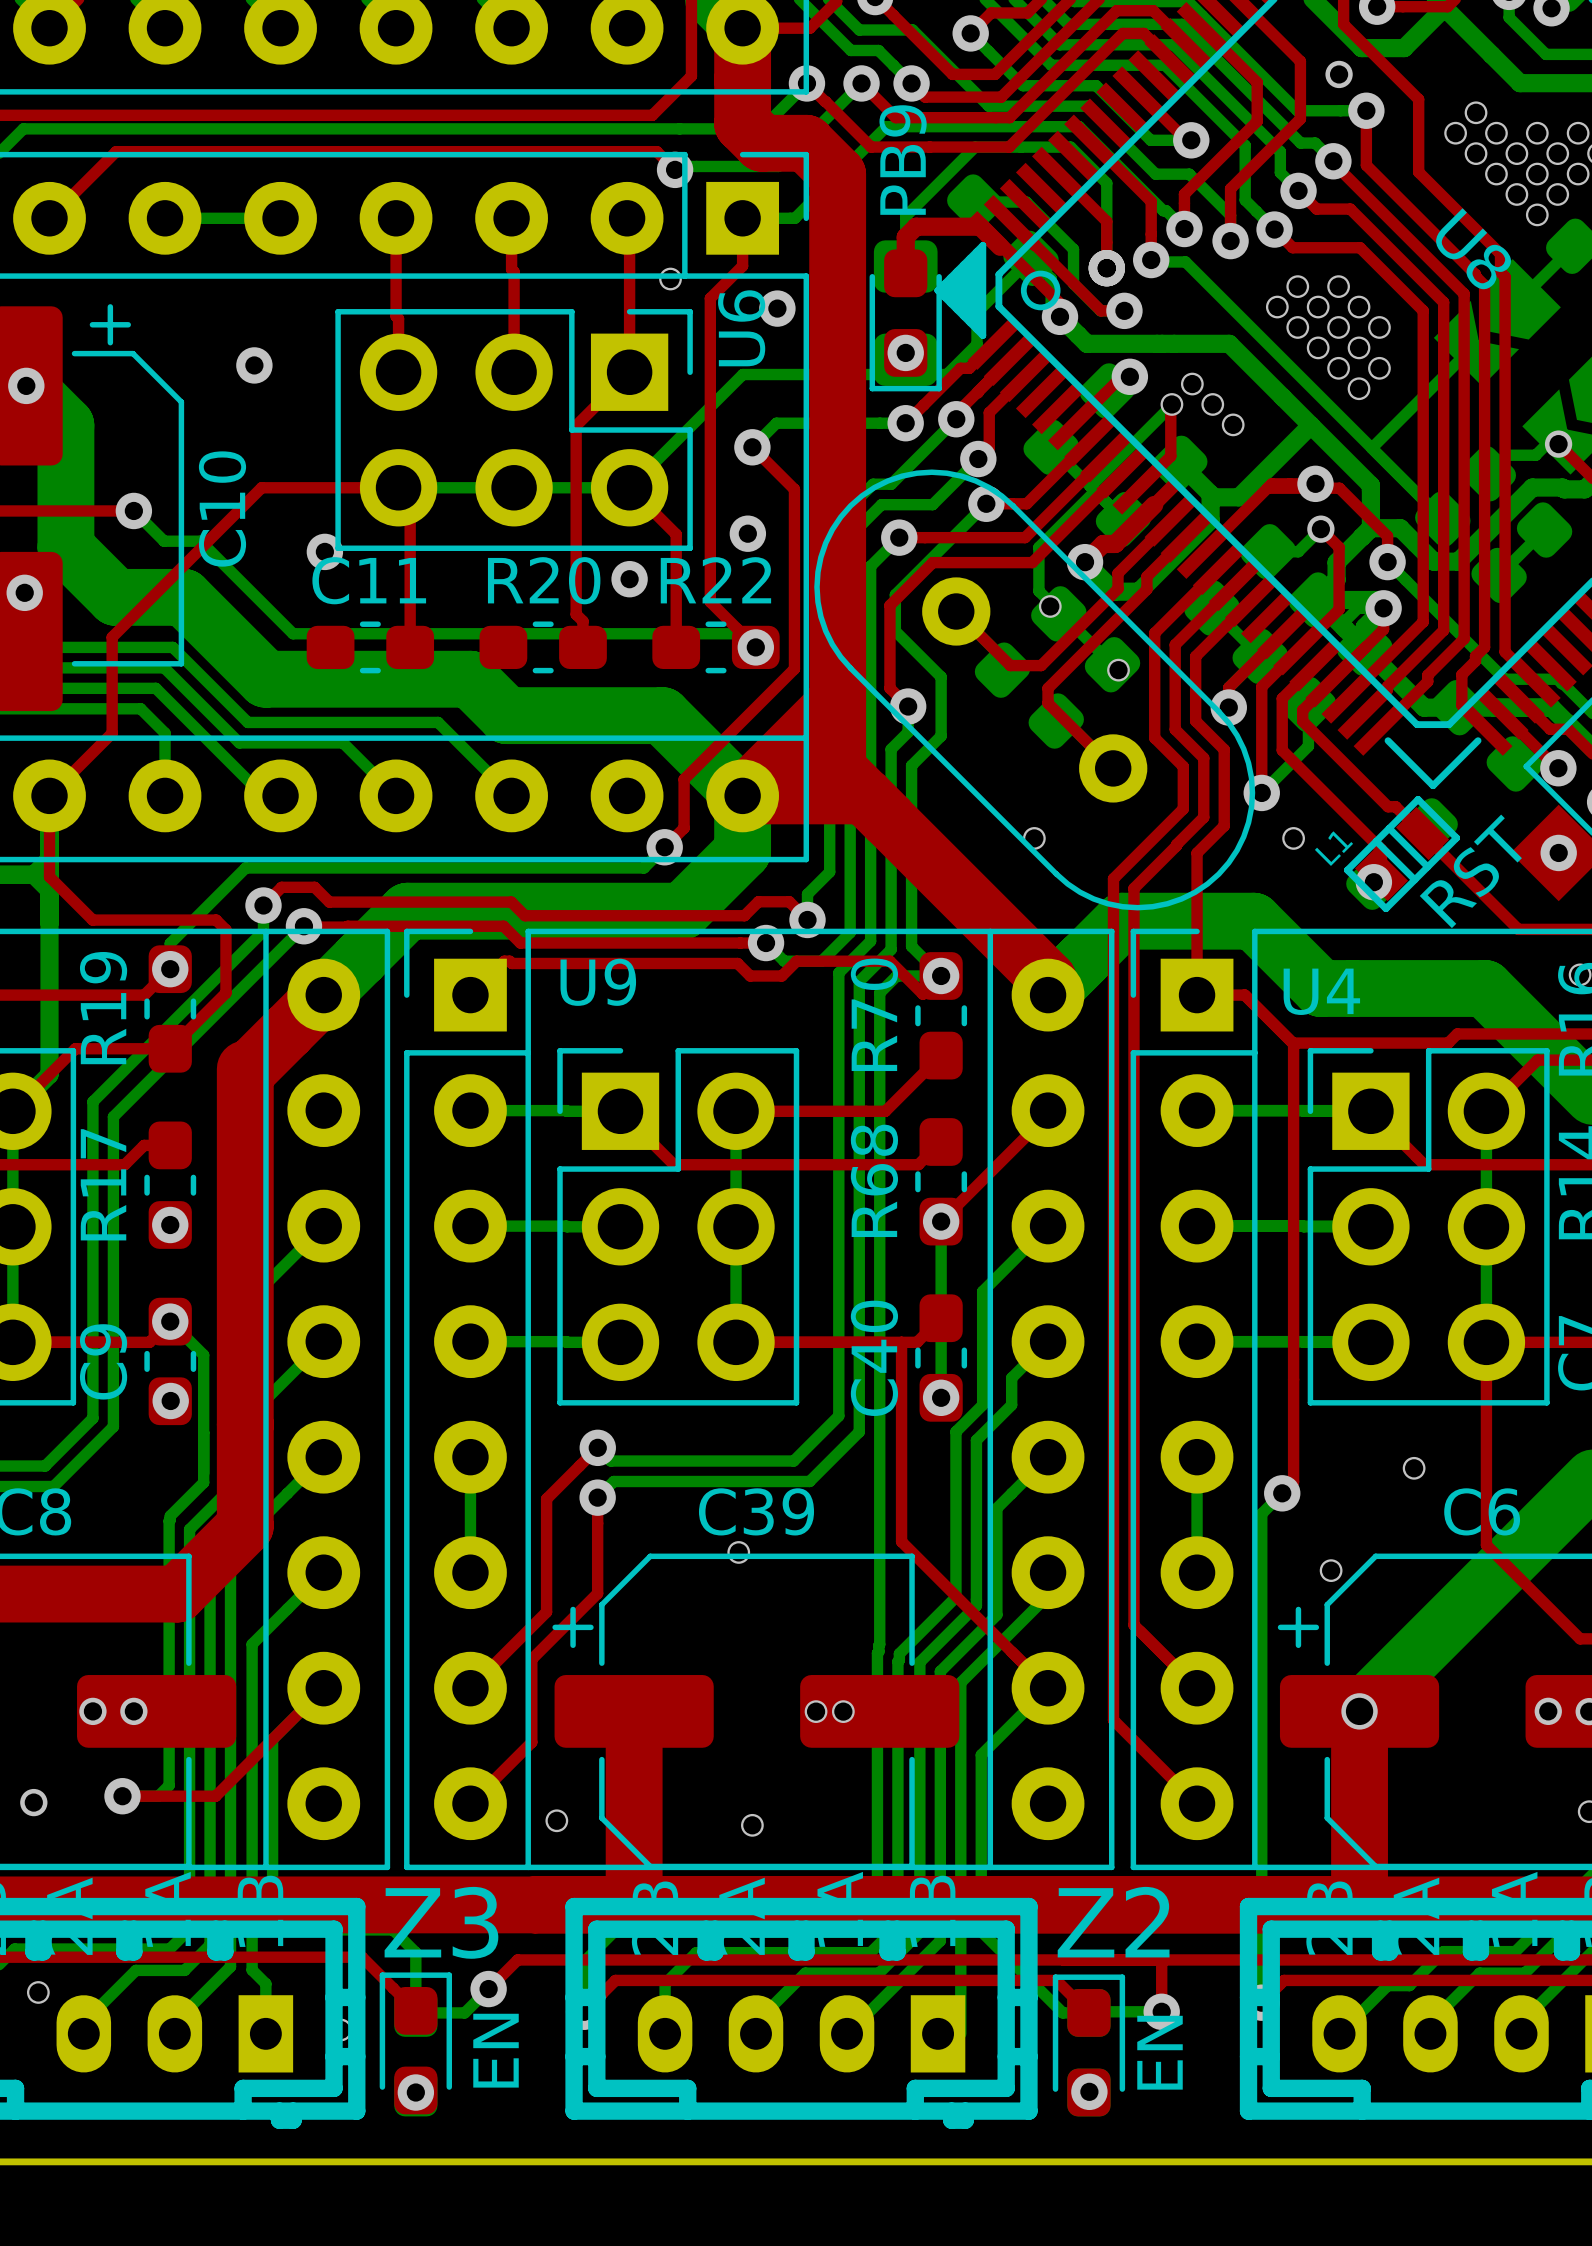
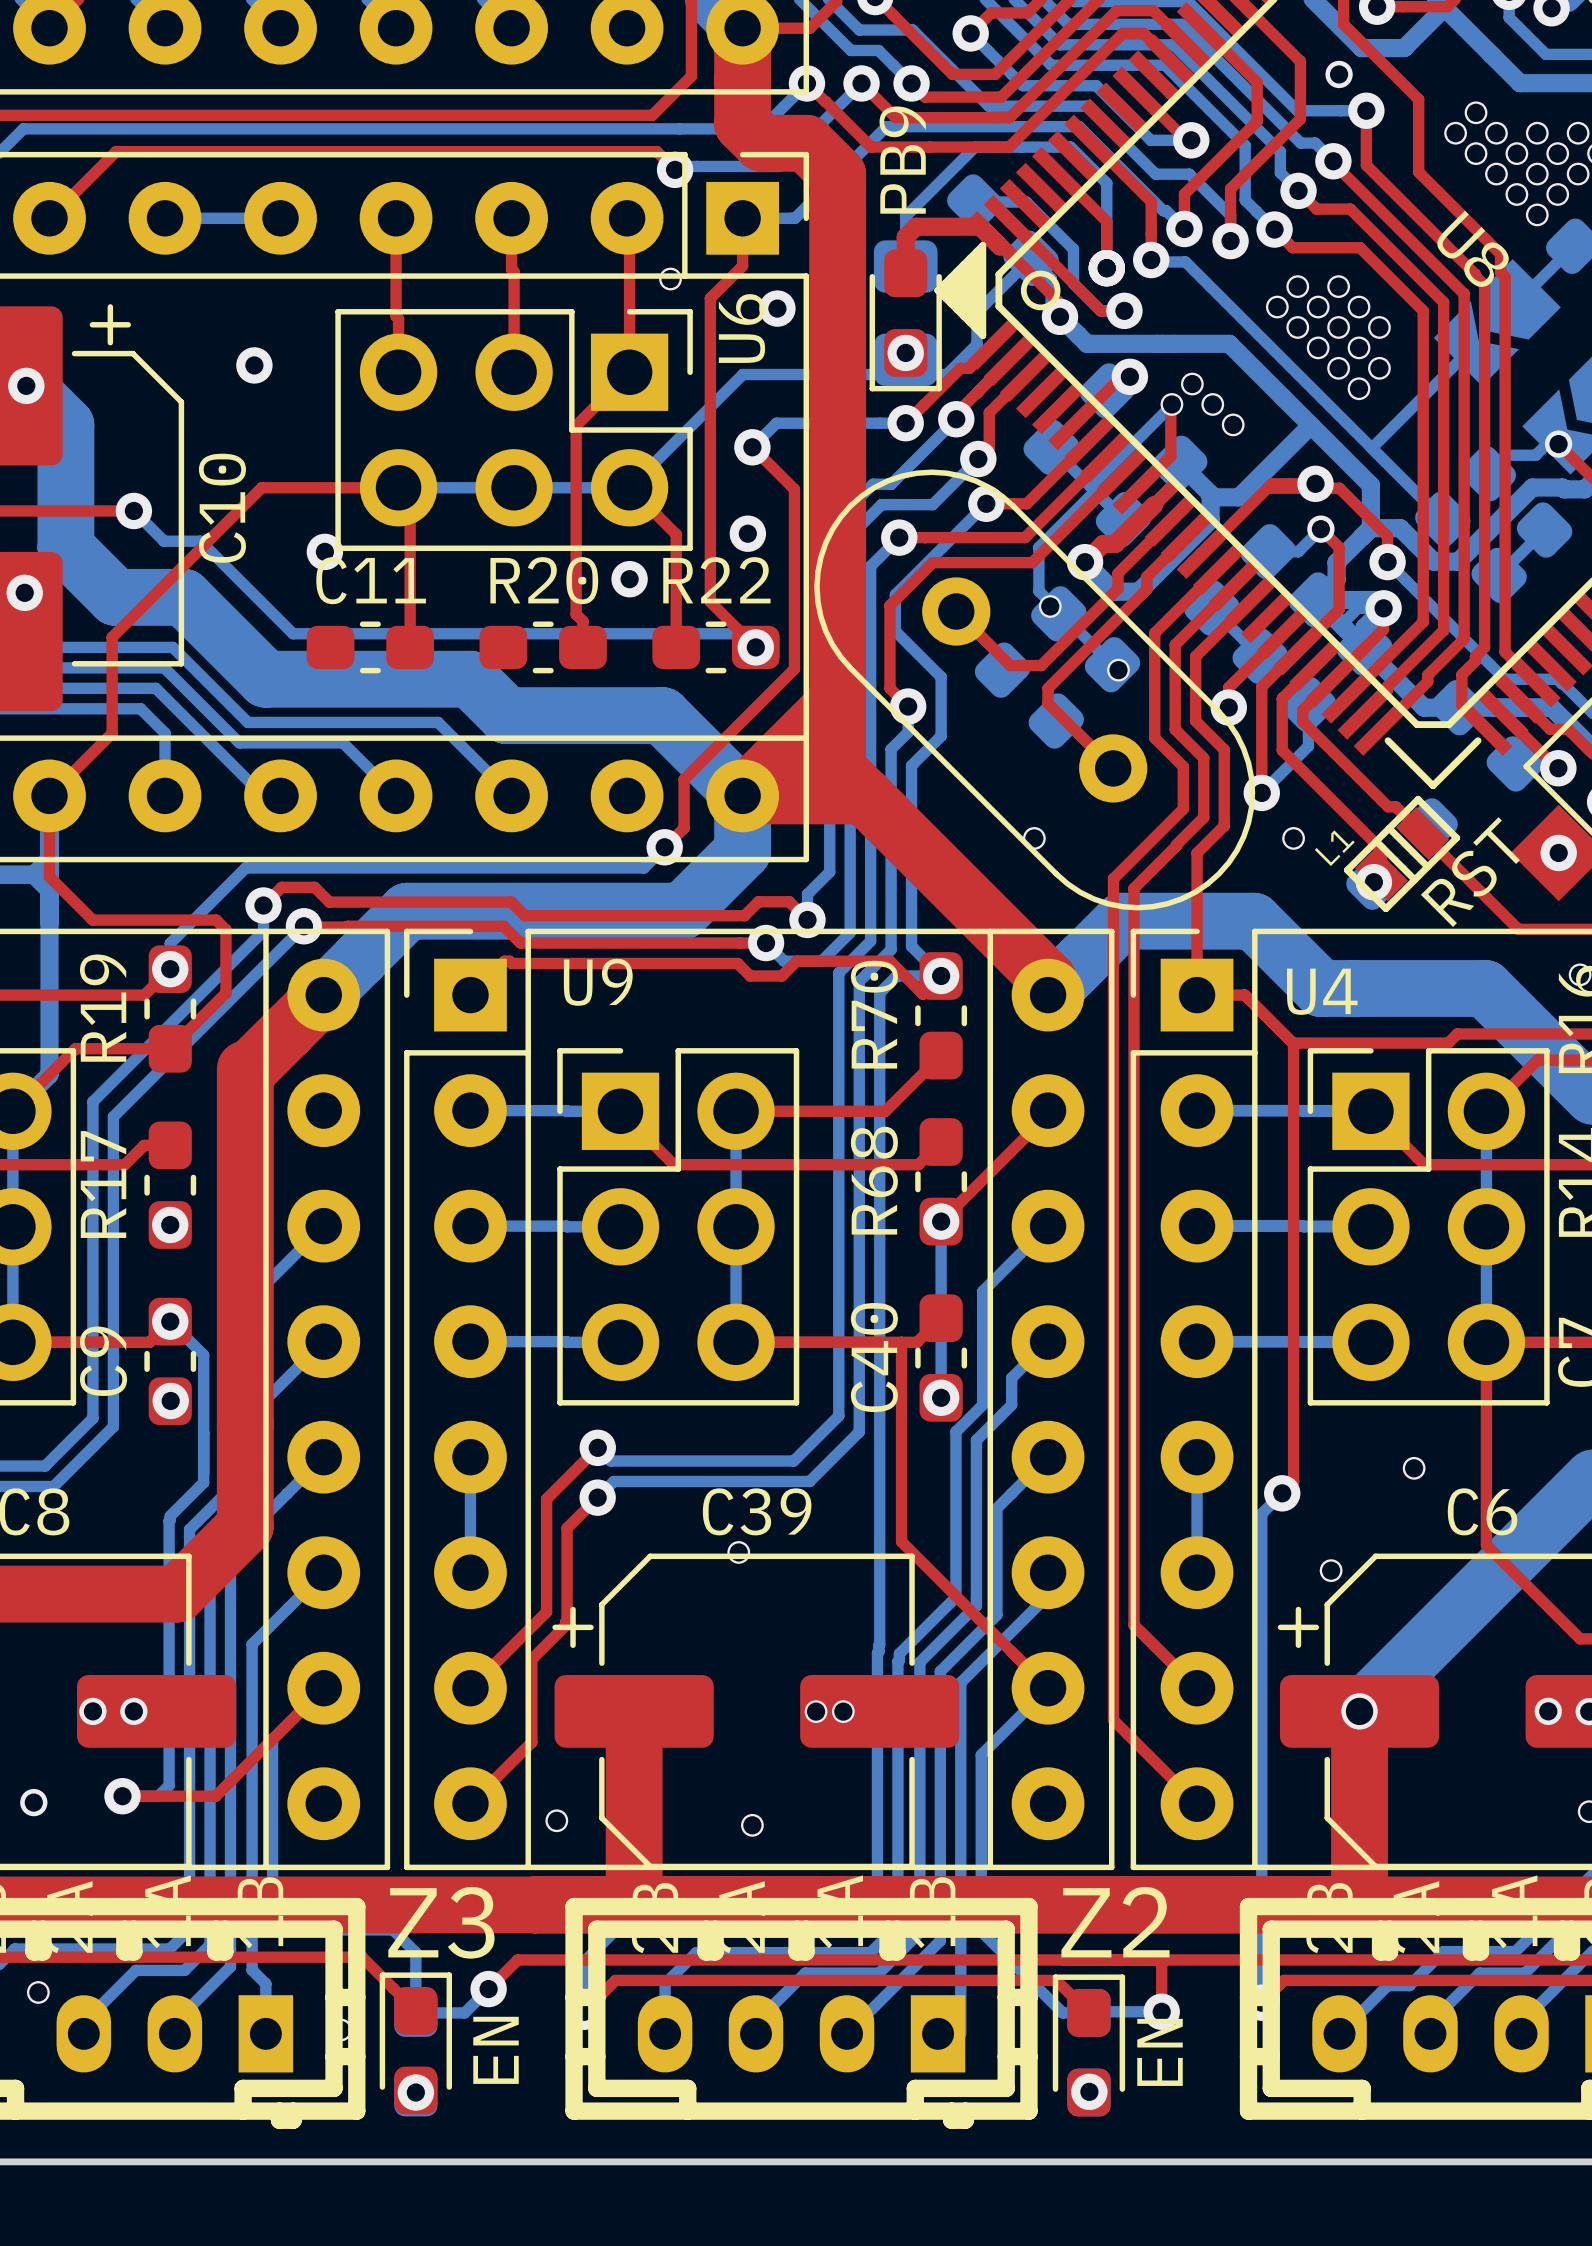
top track: (597, 1497) (597, 1593) (565, 1625) -> (597, 1497) (567, 1528) (565, 1625)

